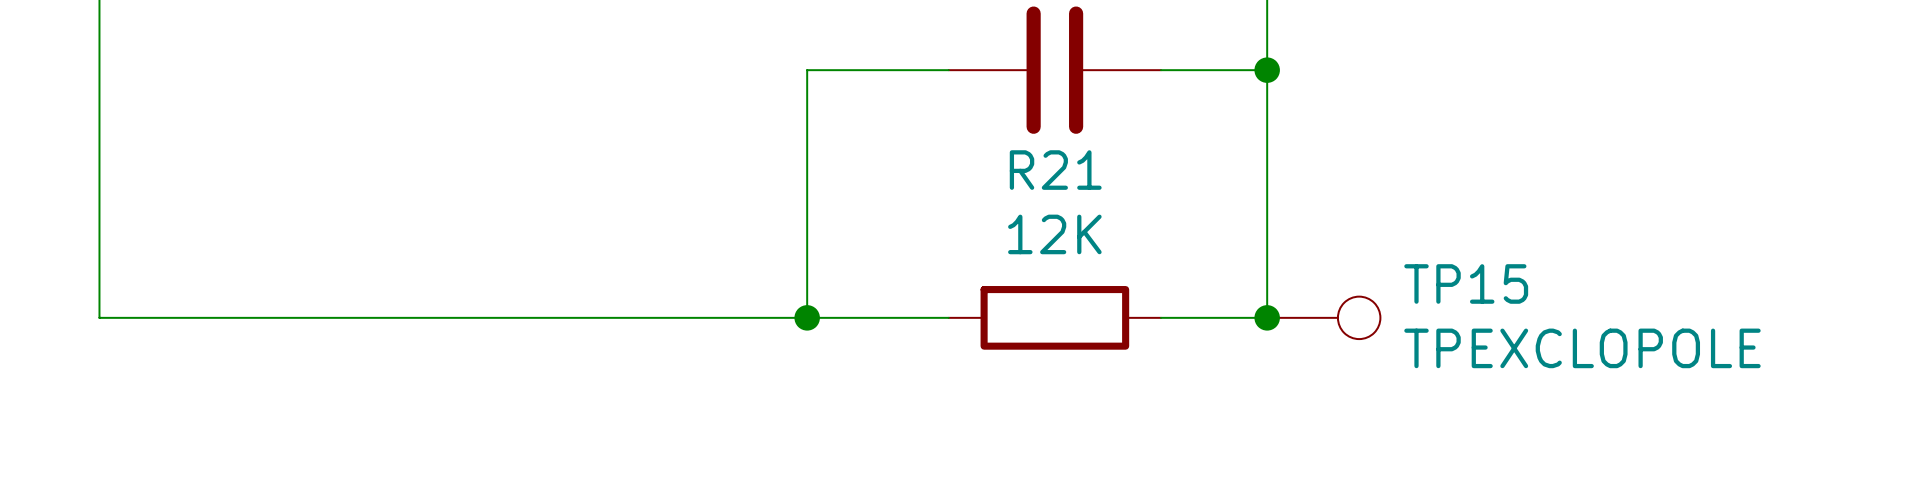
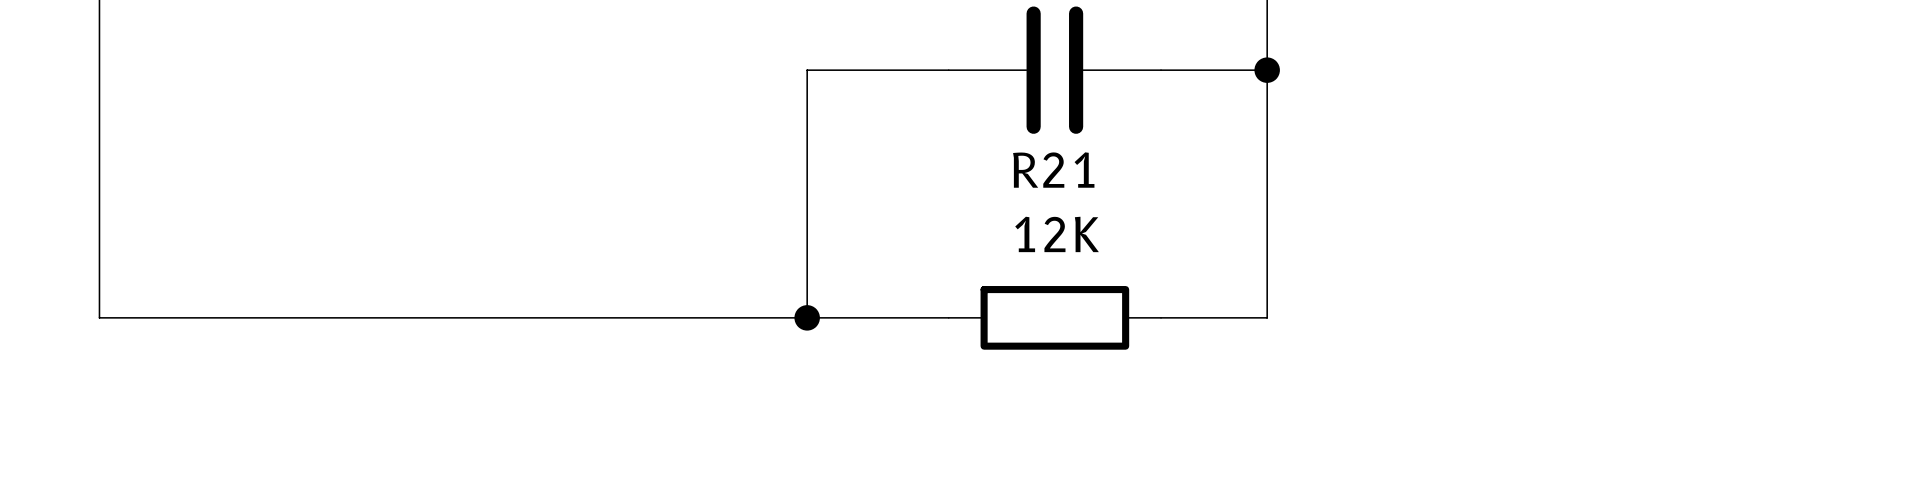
junction: (1267, 317) -> none
TP15: TPEXCLOPOLE (1323, 317) -> none

